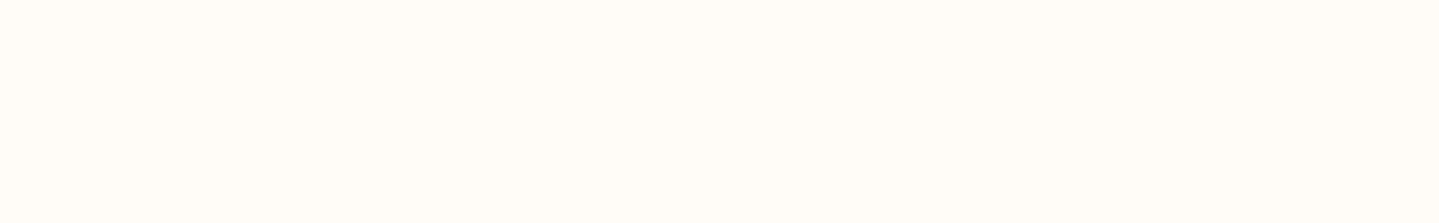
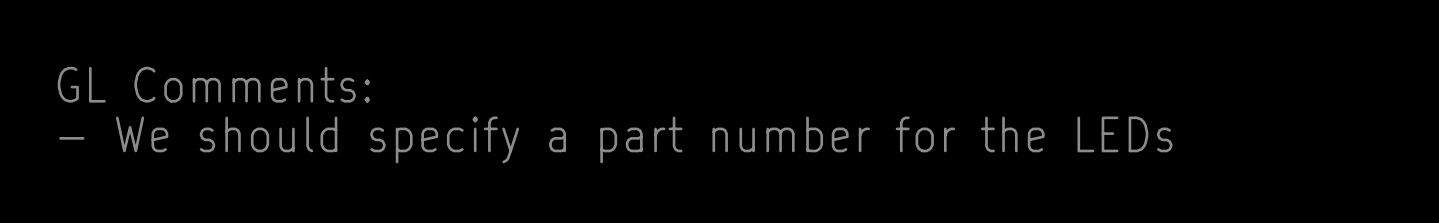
text: none -> GL Comments: (213, 84)
text: none -> - We should specify a part number for the LEDs (615, 139)

